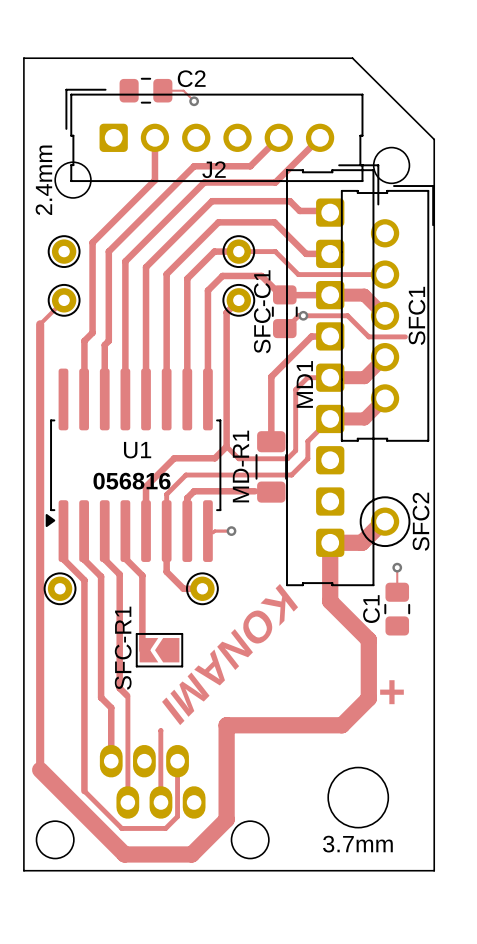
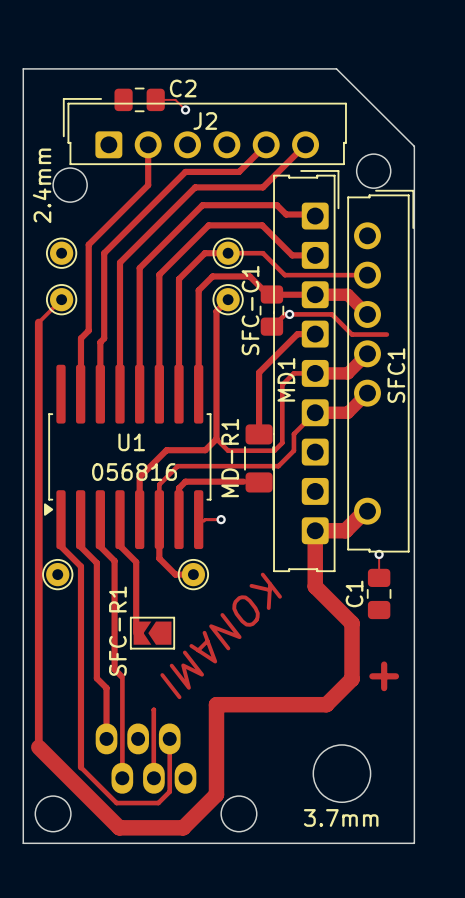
J2 footprint: [65, 88, 364, 183] -> [62, 98, 347, 166]
MD1 footprint: [286, 164, 380, 587] -> [273, 170, 340, 573]
J2 name position: J2 (214, 169) -> J2 (205, 121)
SFC1 footprint: [340, 185, 435, 442] -> [347, 189, 415, 553]
SFC2: (385, 521) -> none

